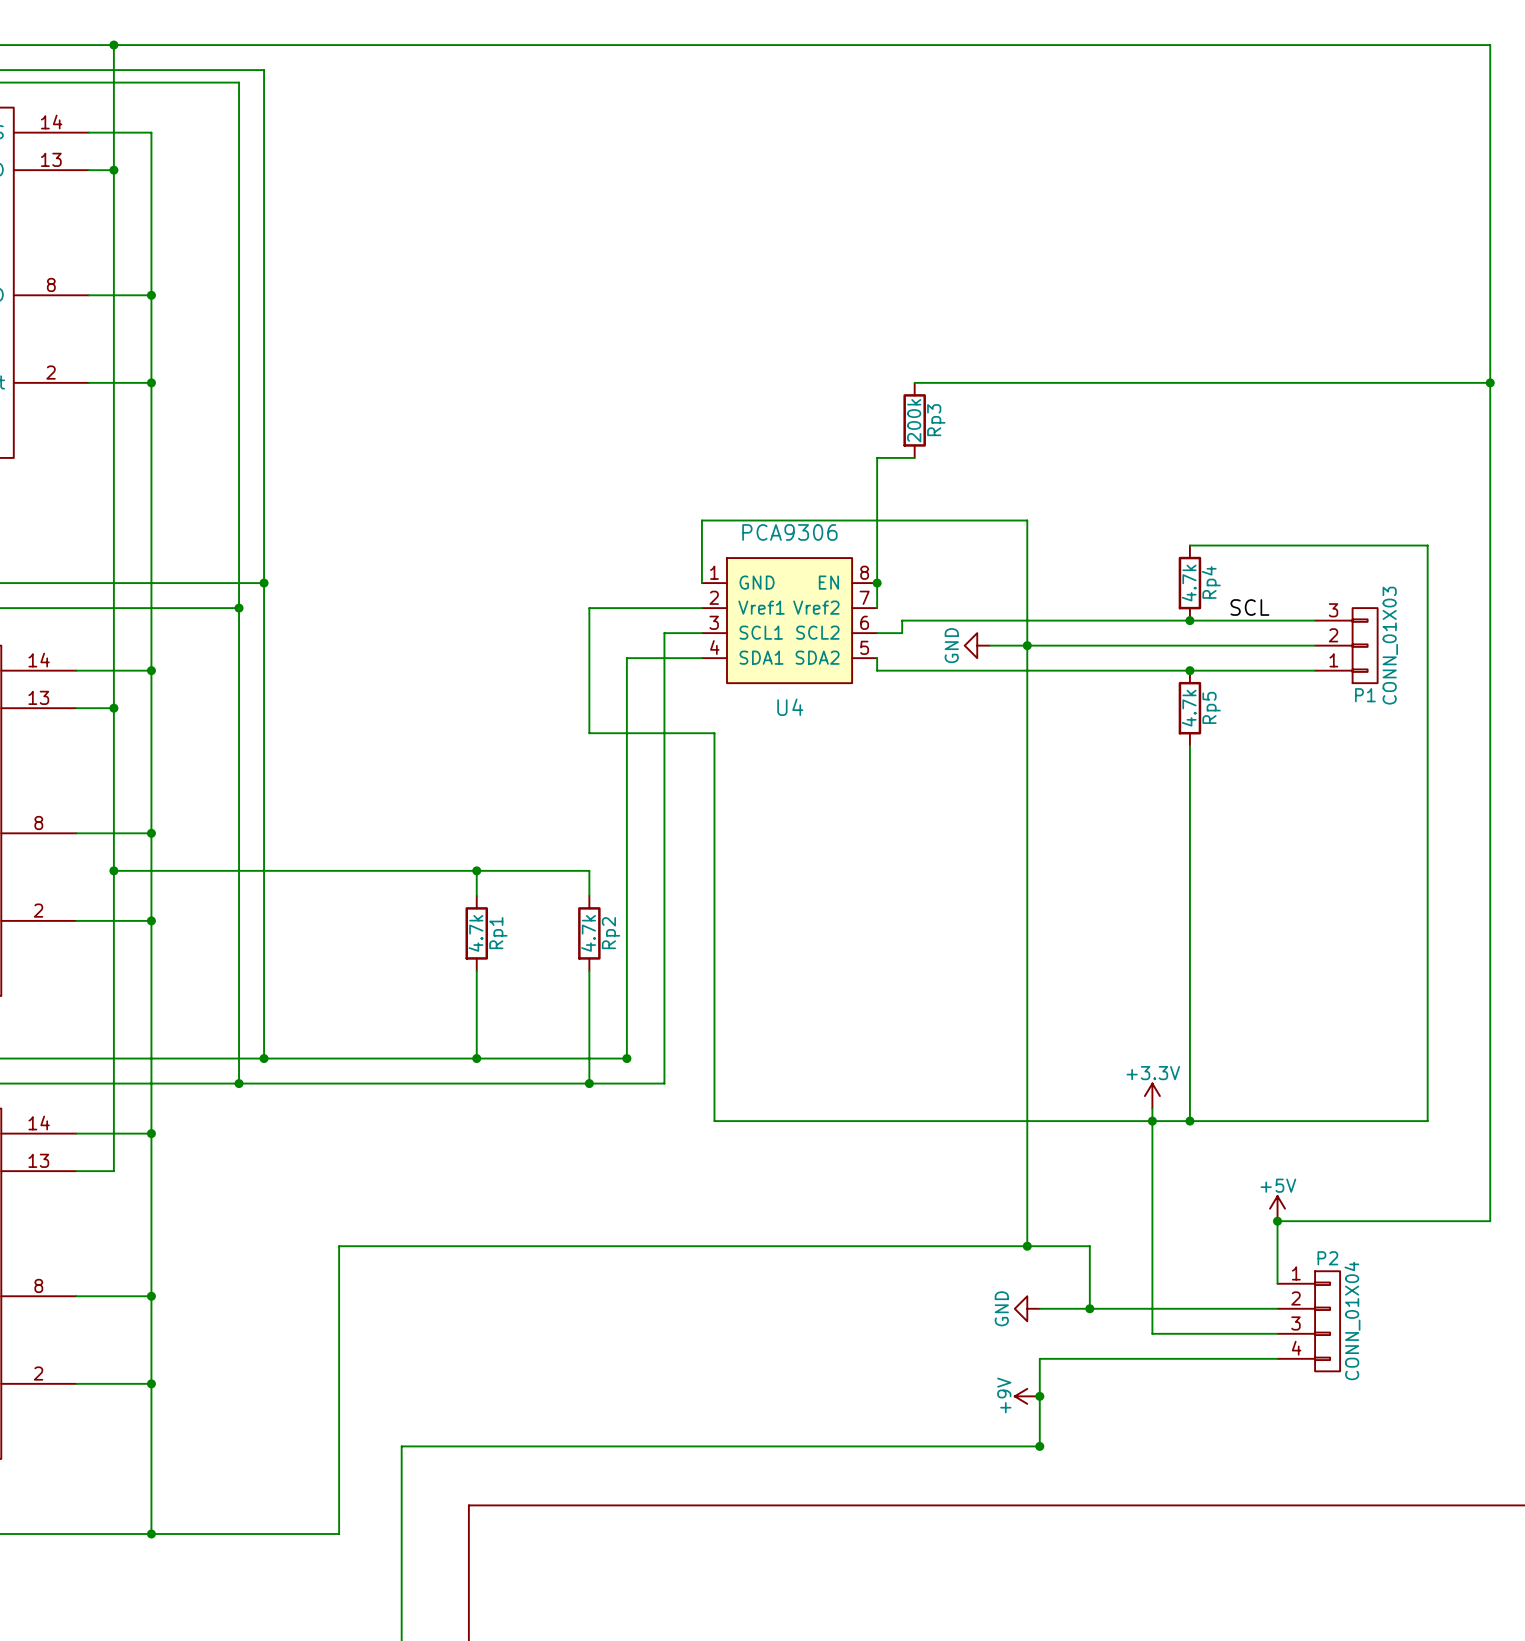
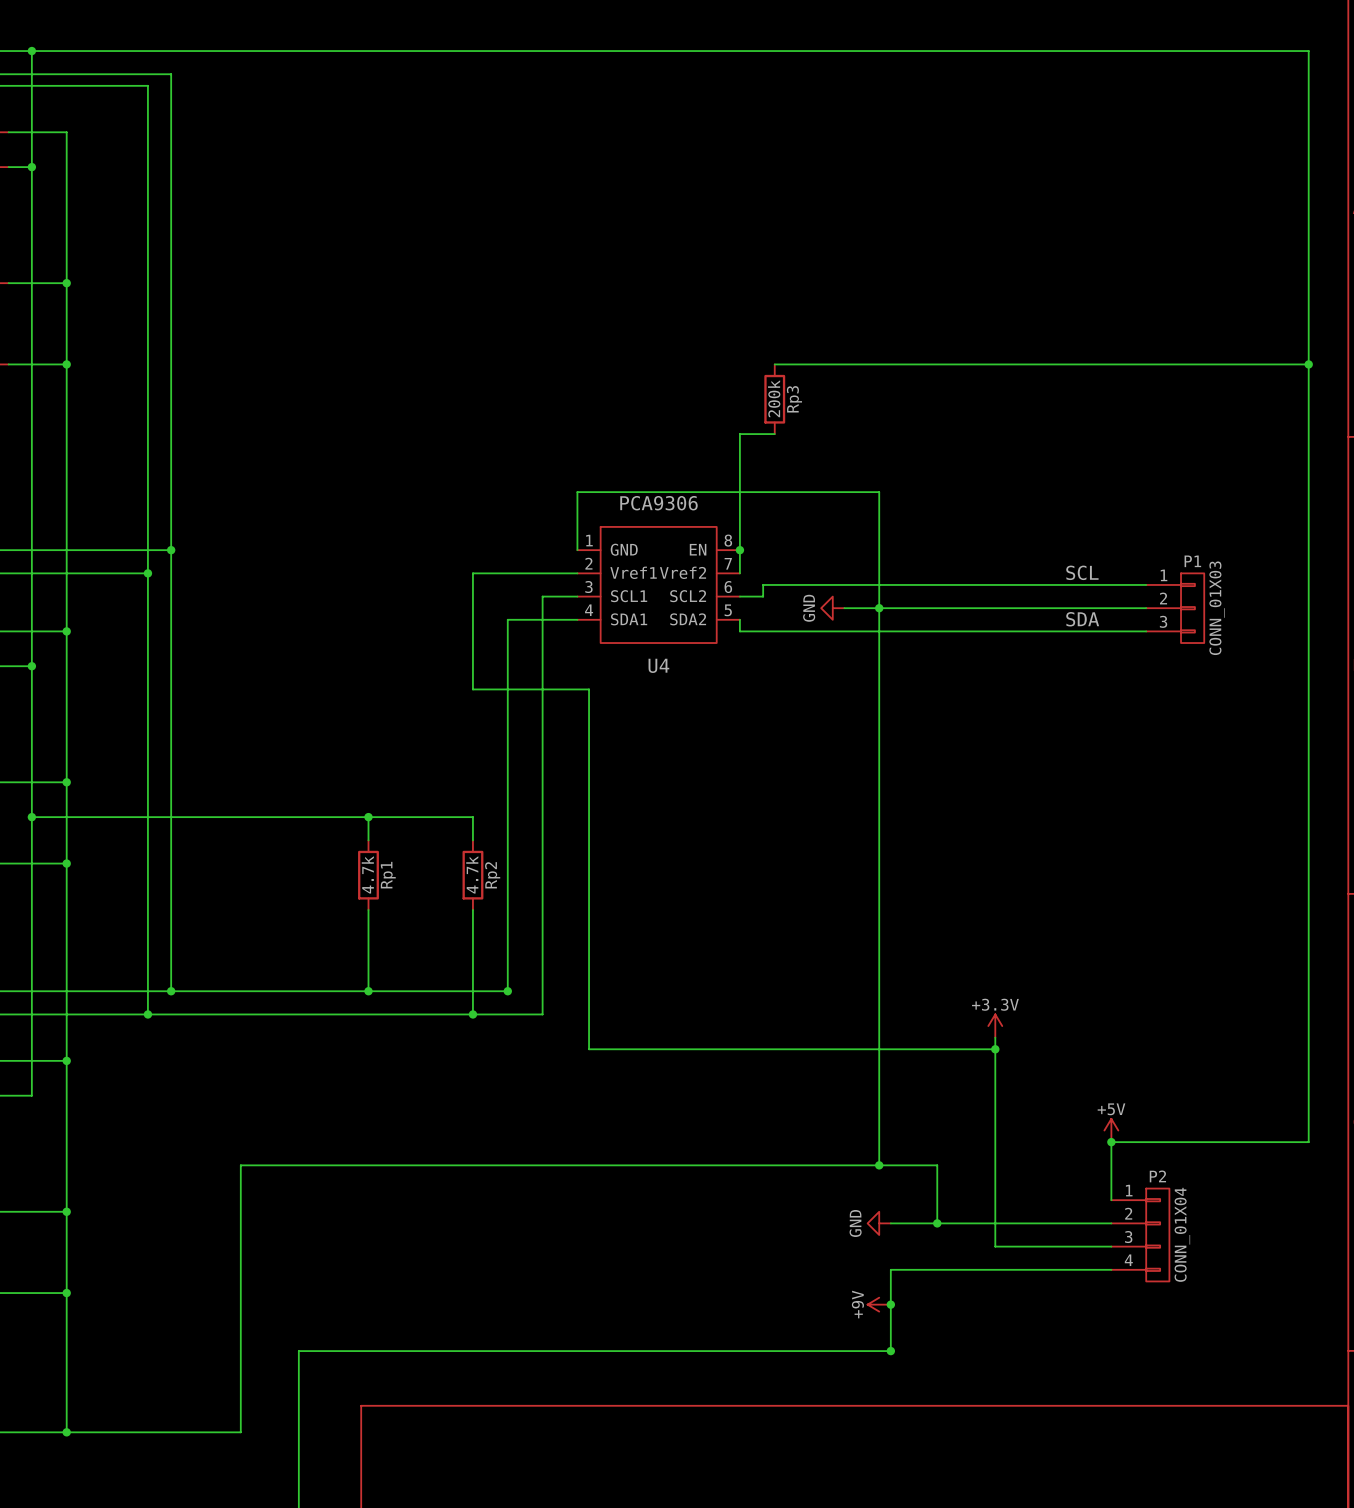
wire: (1189, 545) (1427, 545) (1427, 1121) (1152, 1121) -> none
Rp4: 4.7k (1189, 583) -> none
junction: (1189, 620) -> none
P1 flip: as is (1365, 645) -> up-down (1192, 608)
label: none -> SDA (1082, 619)
junction: (1189, 670) -> none
Rp5: 4.7k (1189, 708) -> none
wire: (1189, 745) (1189, 1121) -> none
junction: (1189, 1121) -> none

